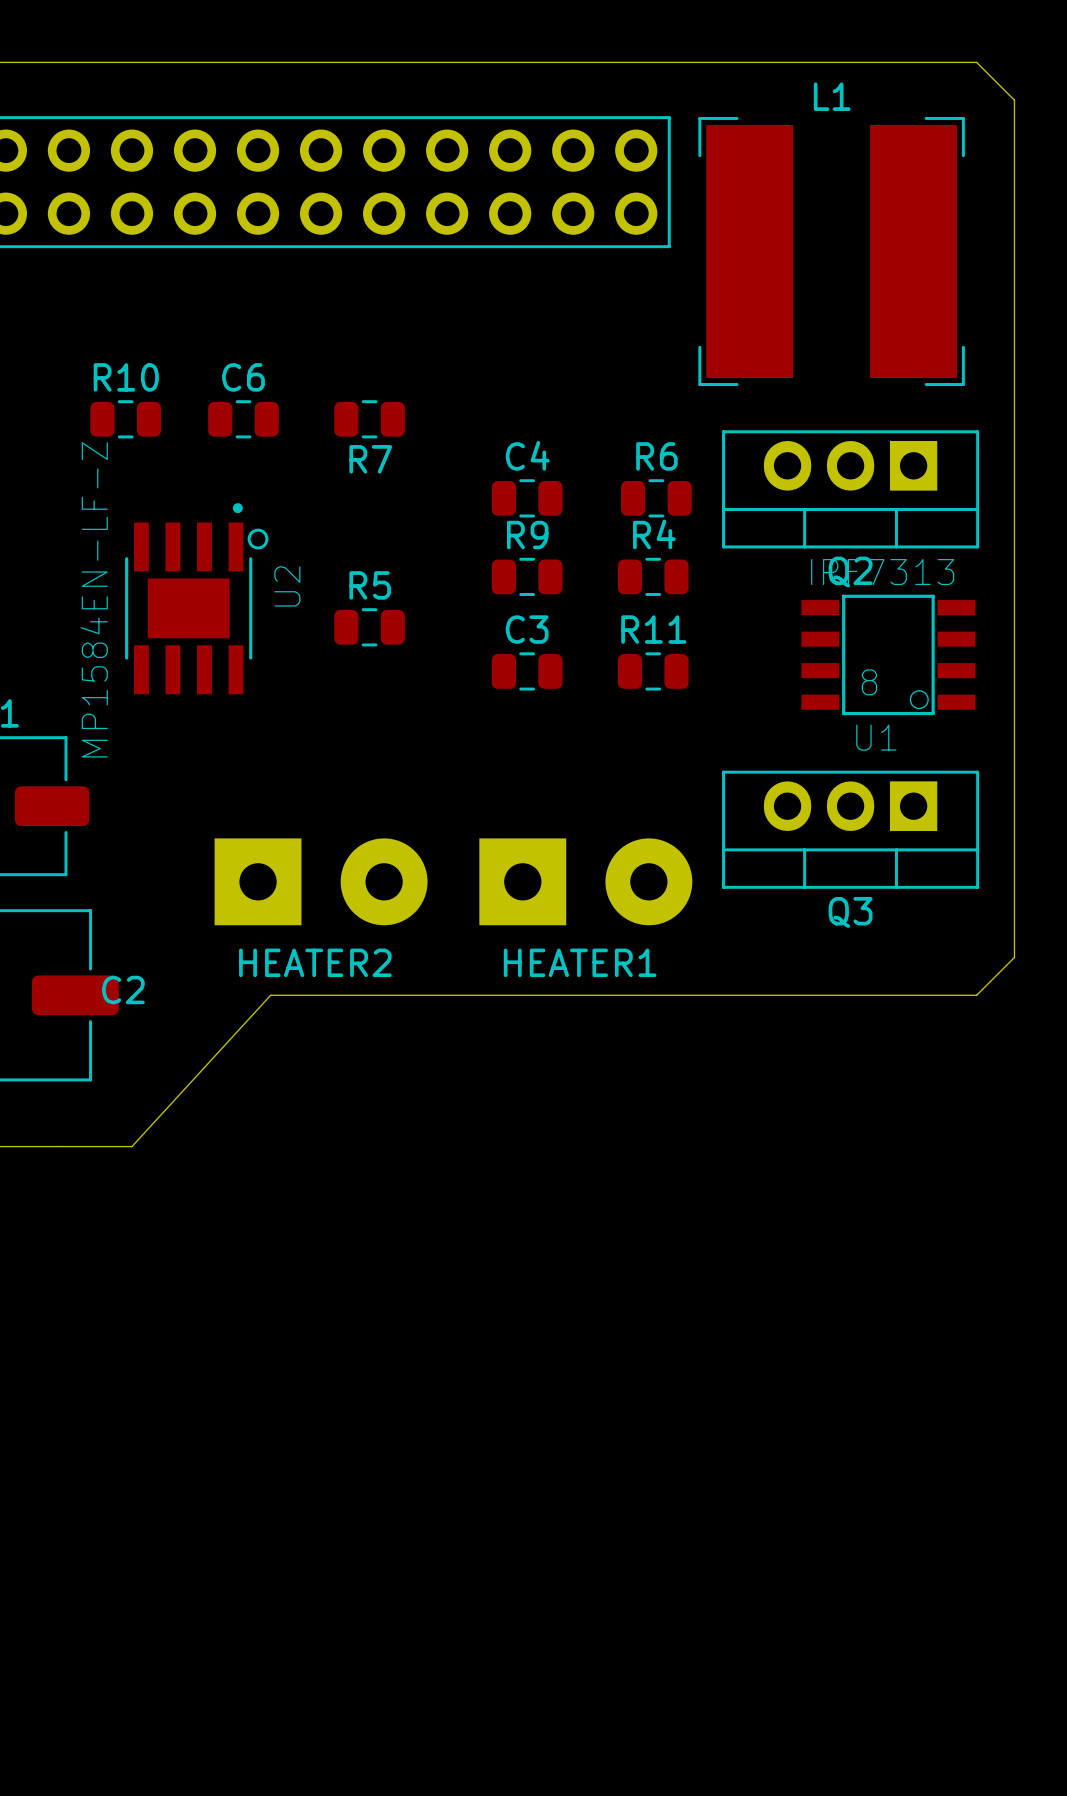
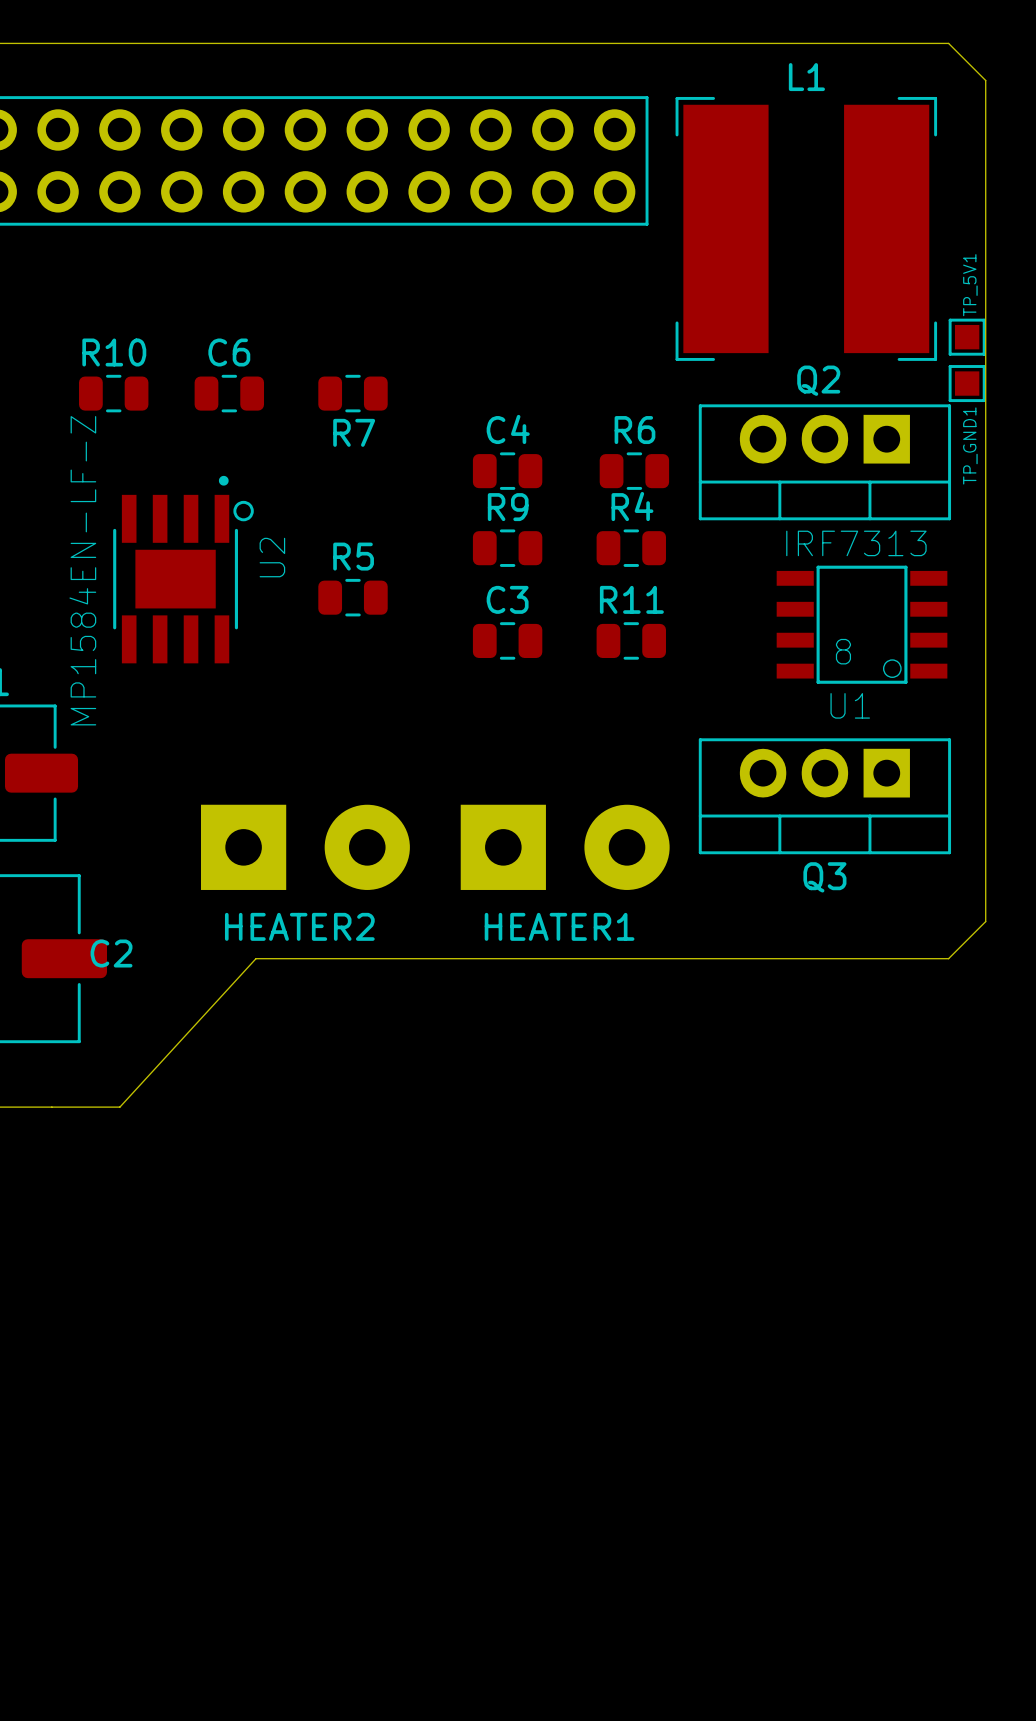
TP_5V1: none -> (967, 337)
TP_GND1: none -> (967, 383)
Q2 name position: Q2 (850, 572) -> Q2 (818, 380)

